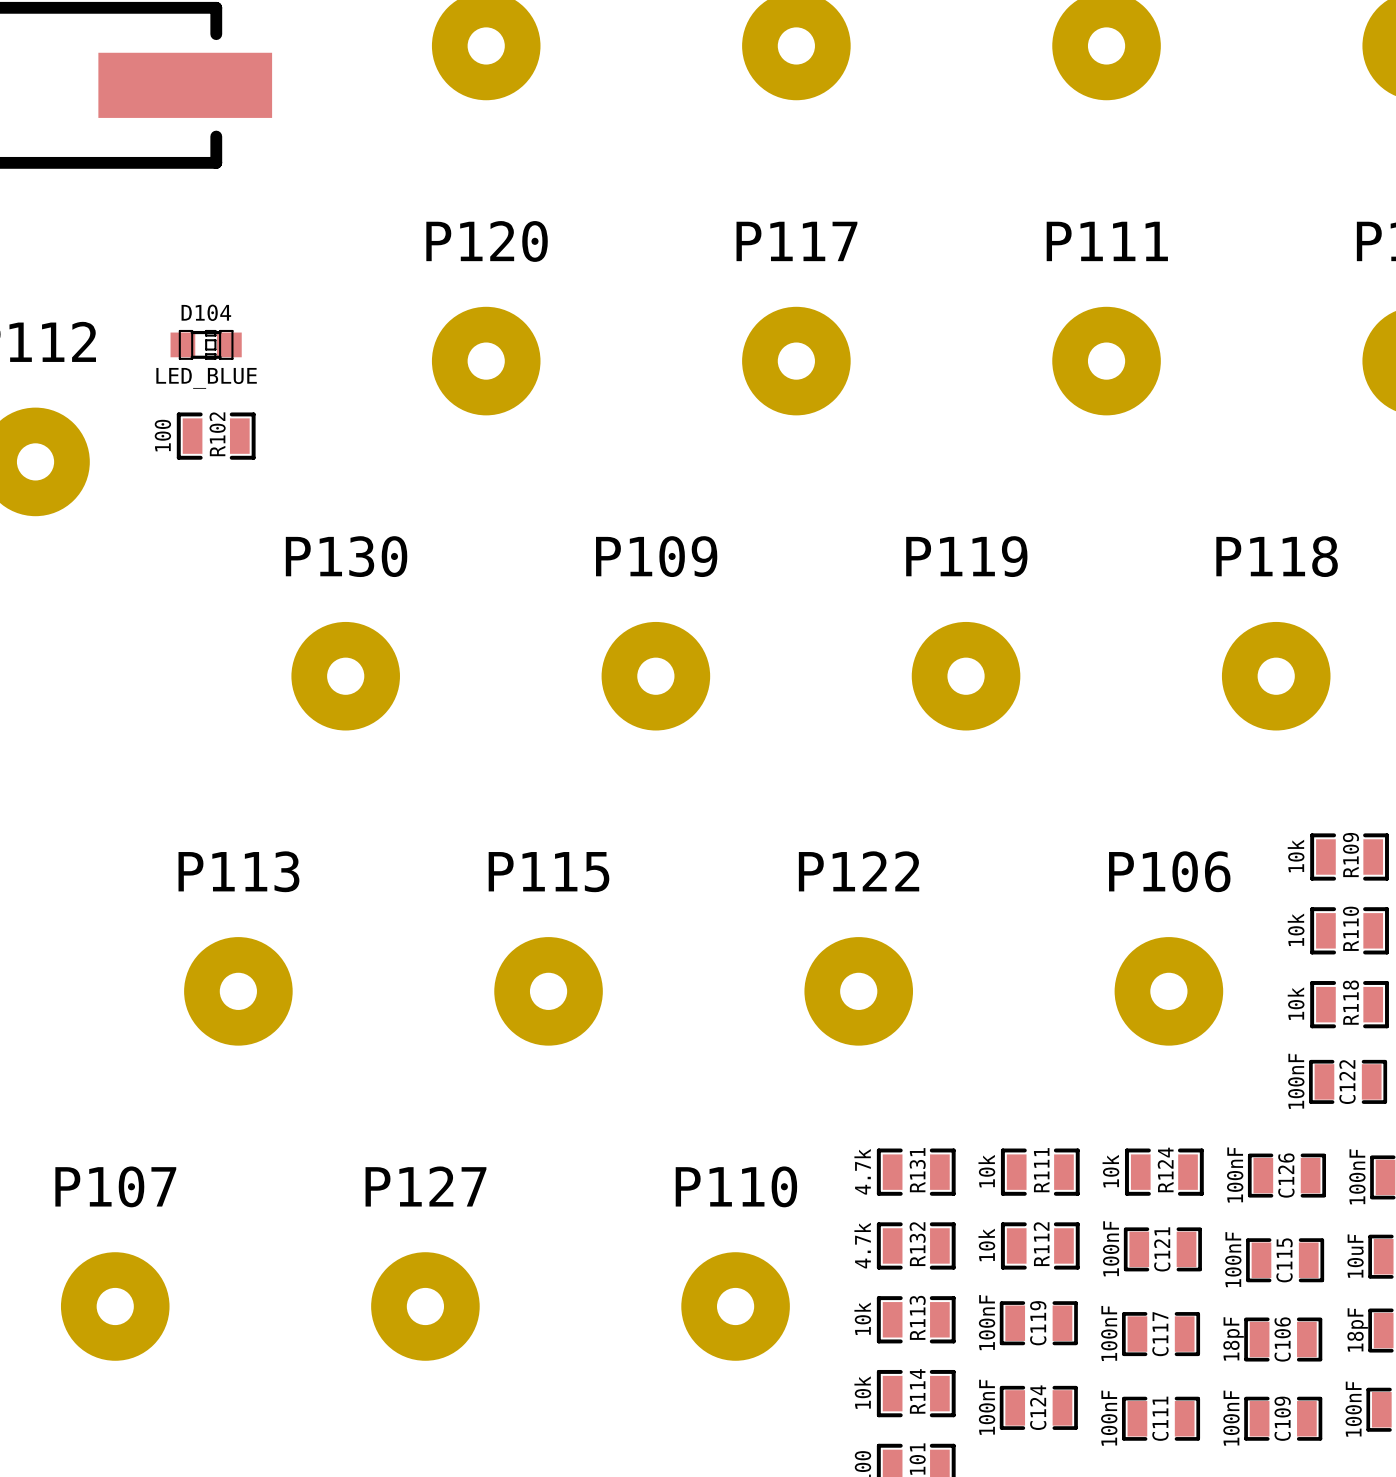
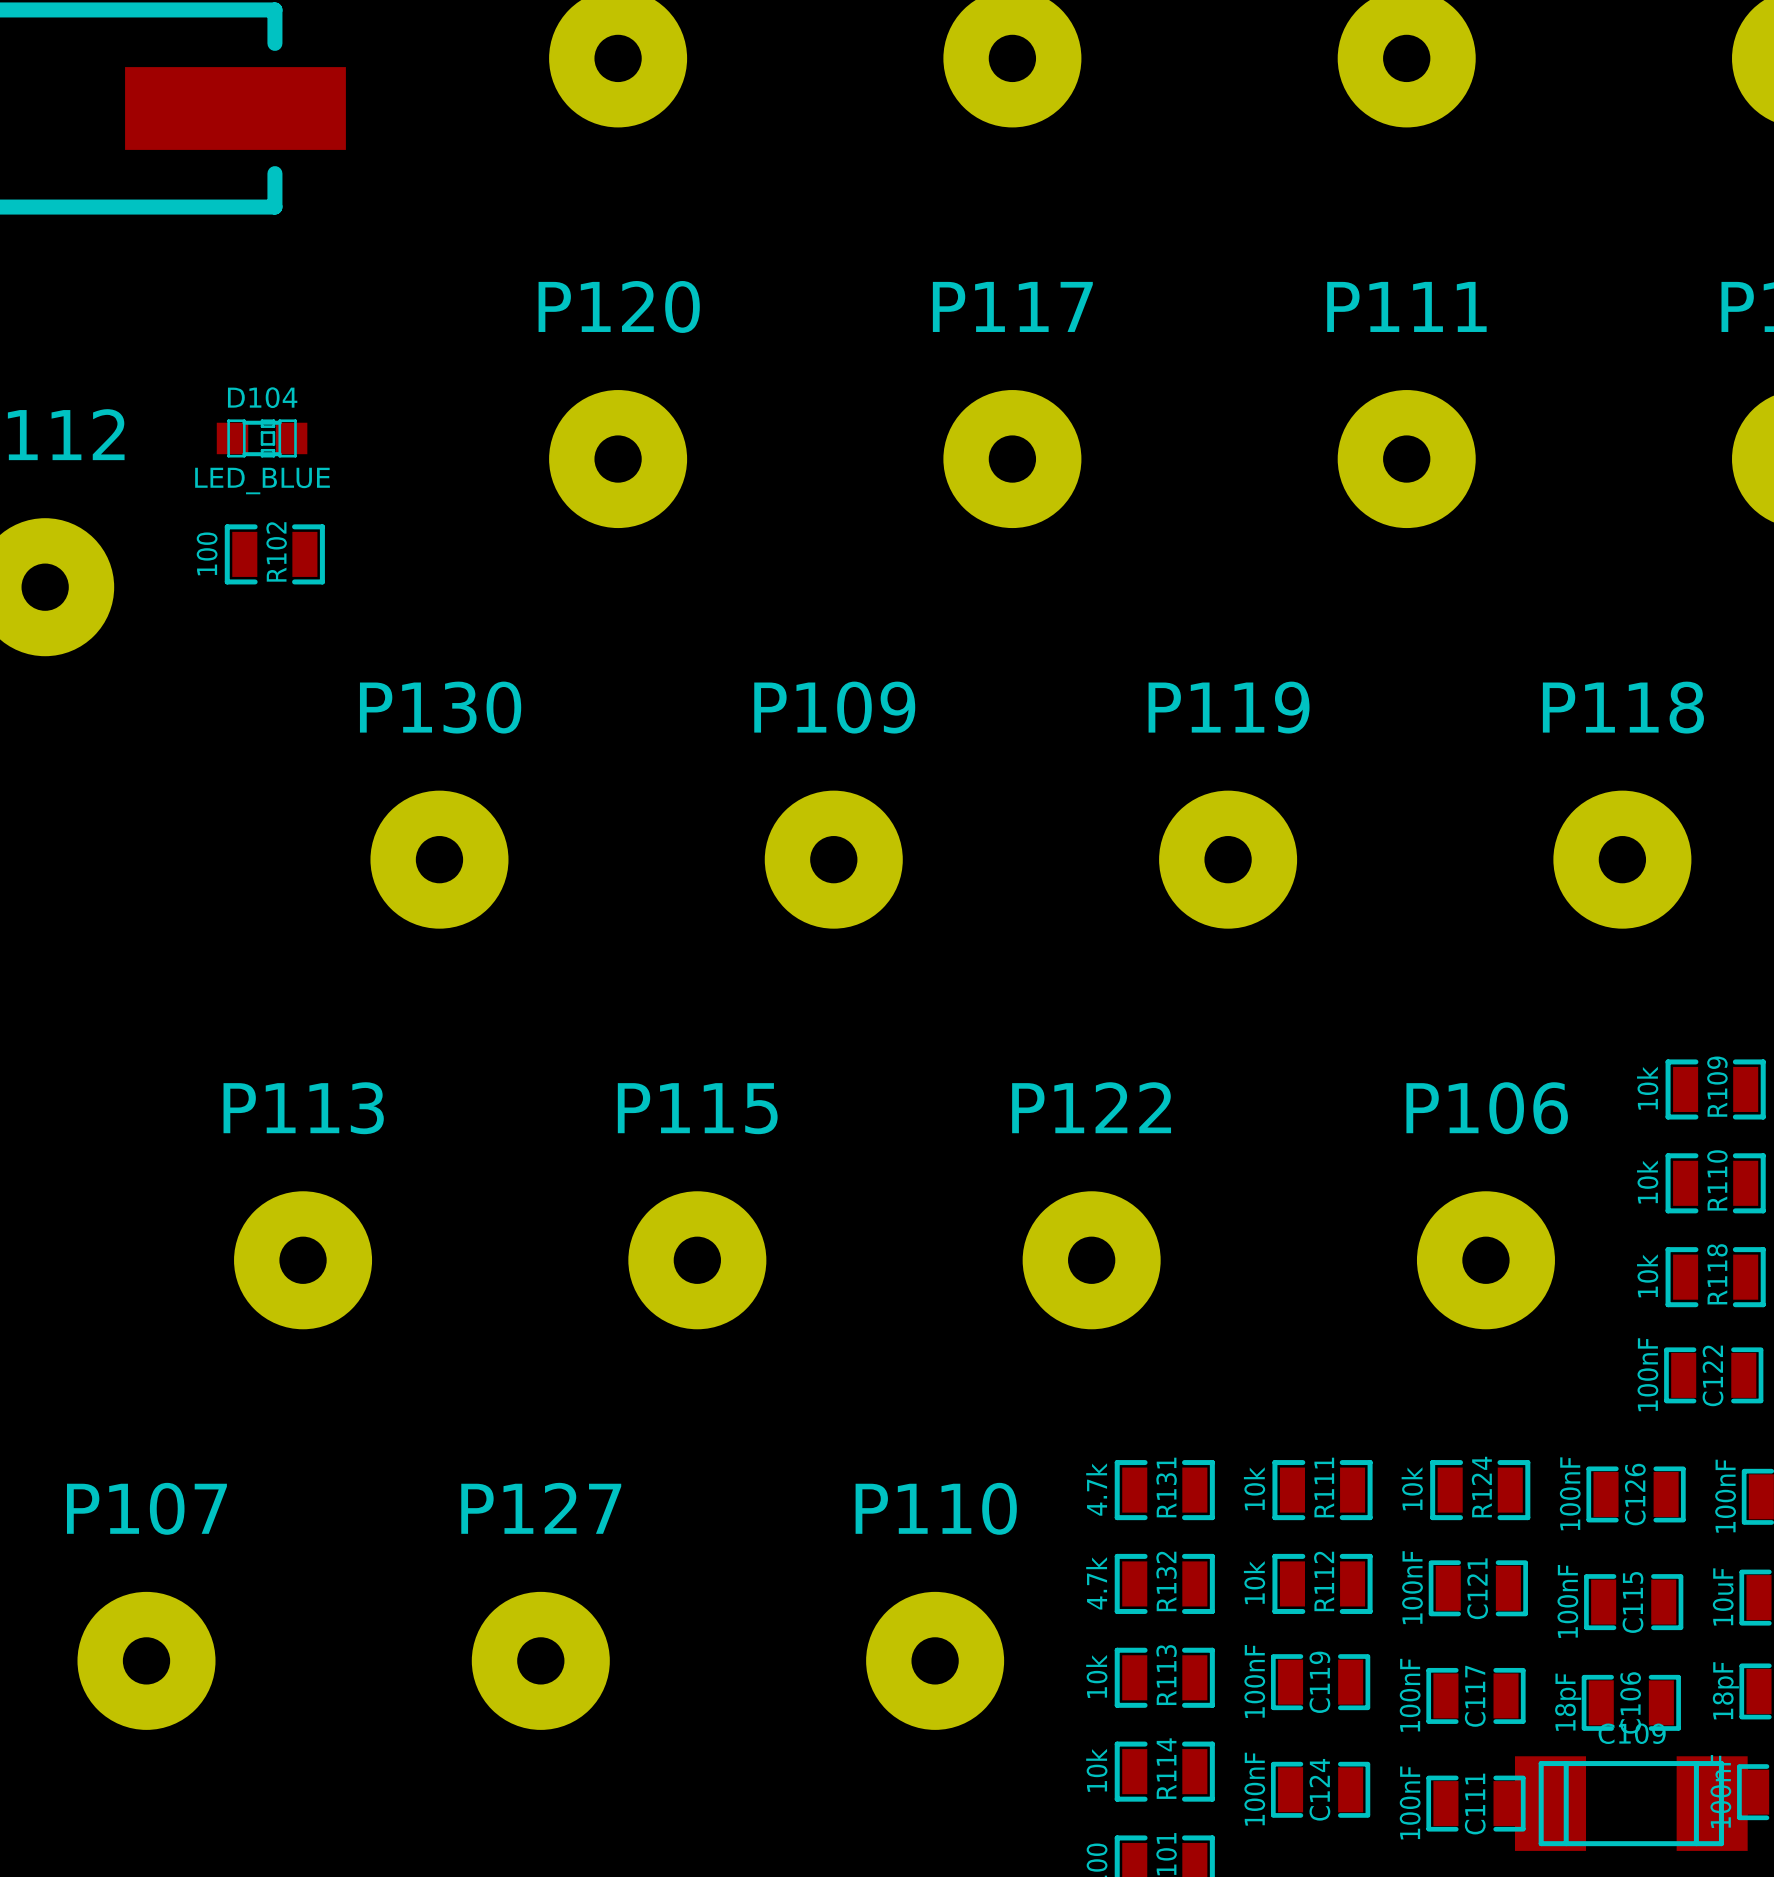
C109 footprint: [1244, 1396, 1323, 1441] -> [1515, 1756, 1748, 1851]
C109 value: 100nF (1231, 1418) -> none

